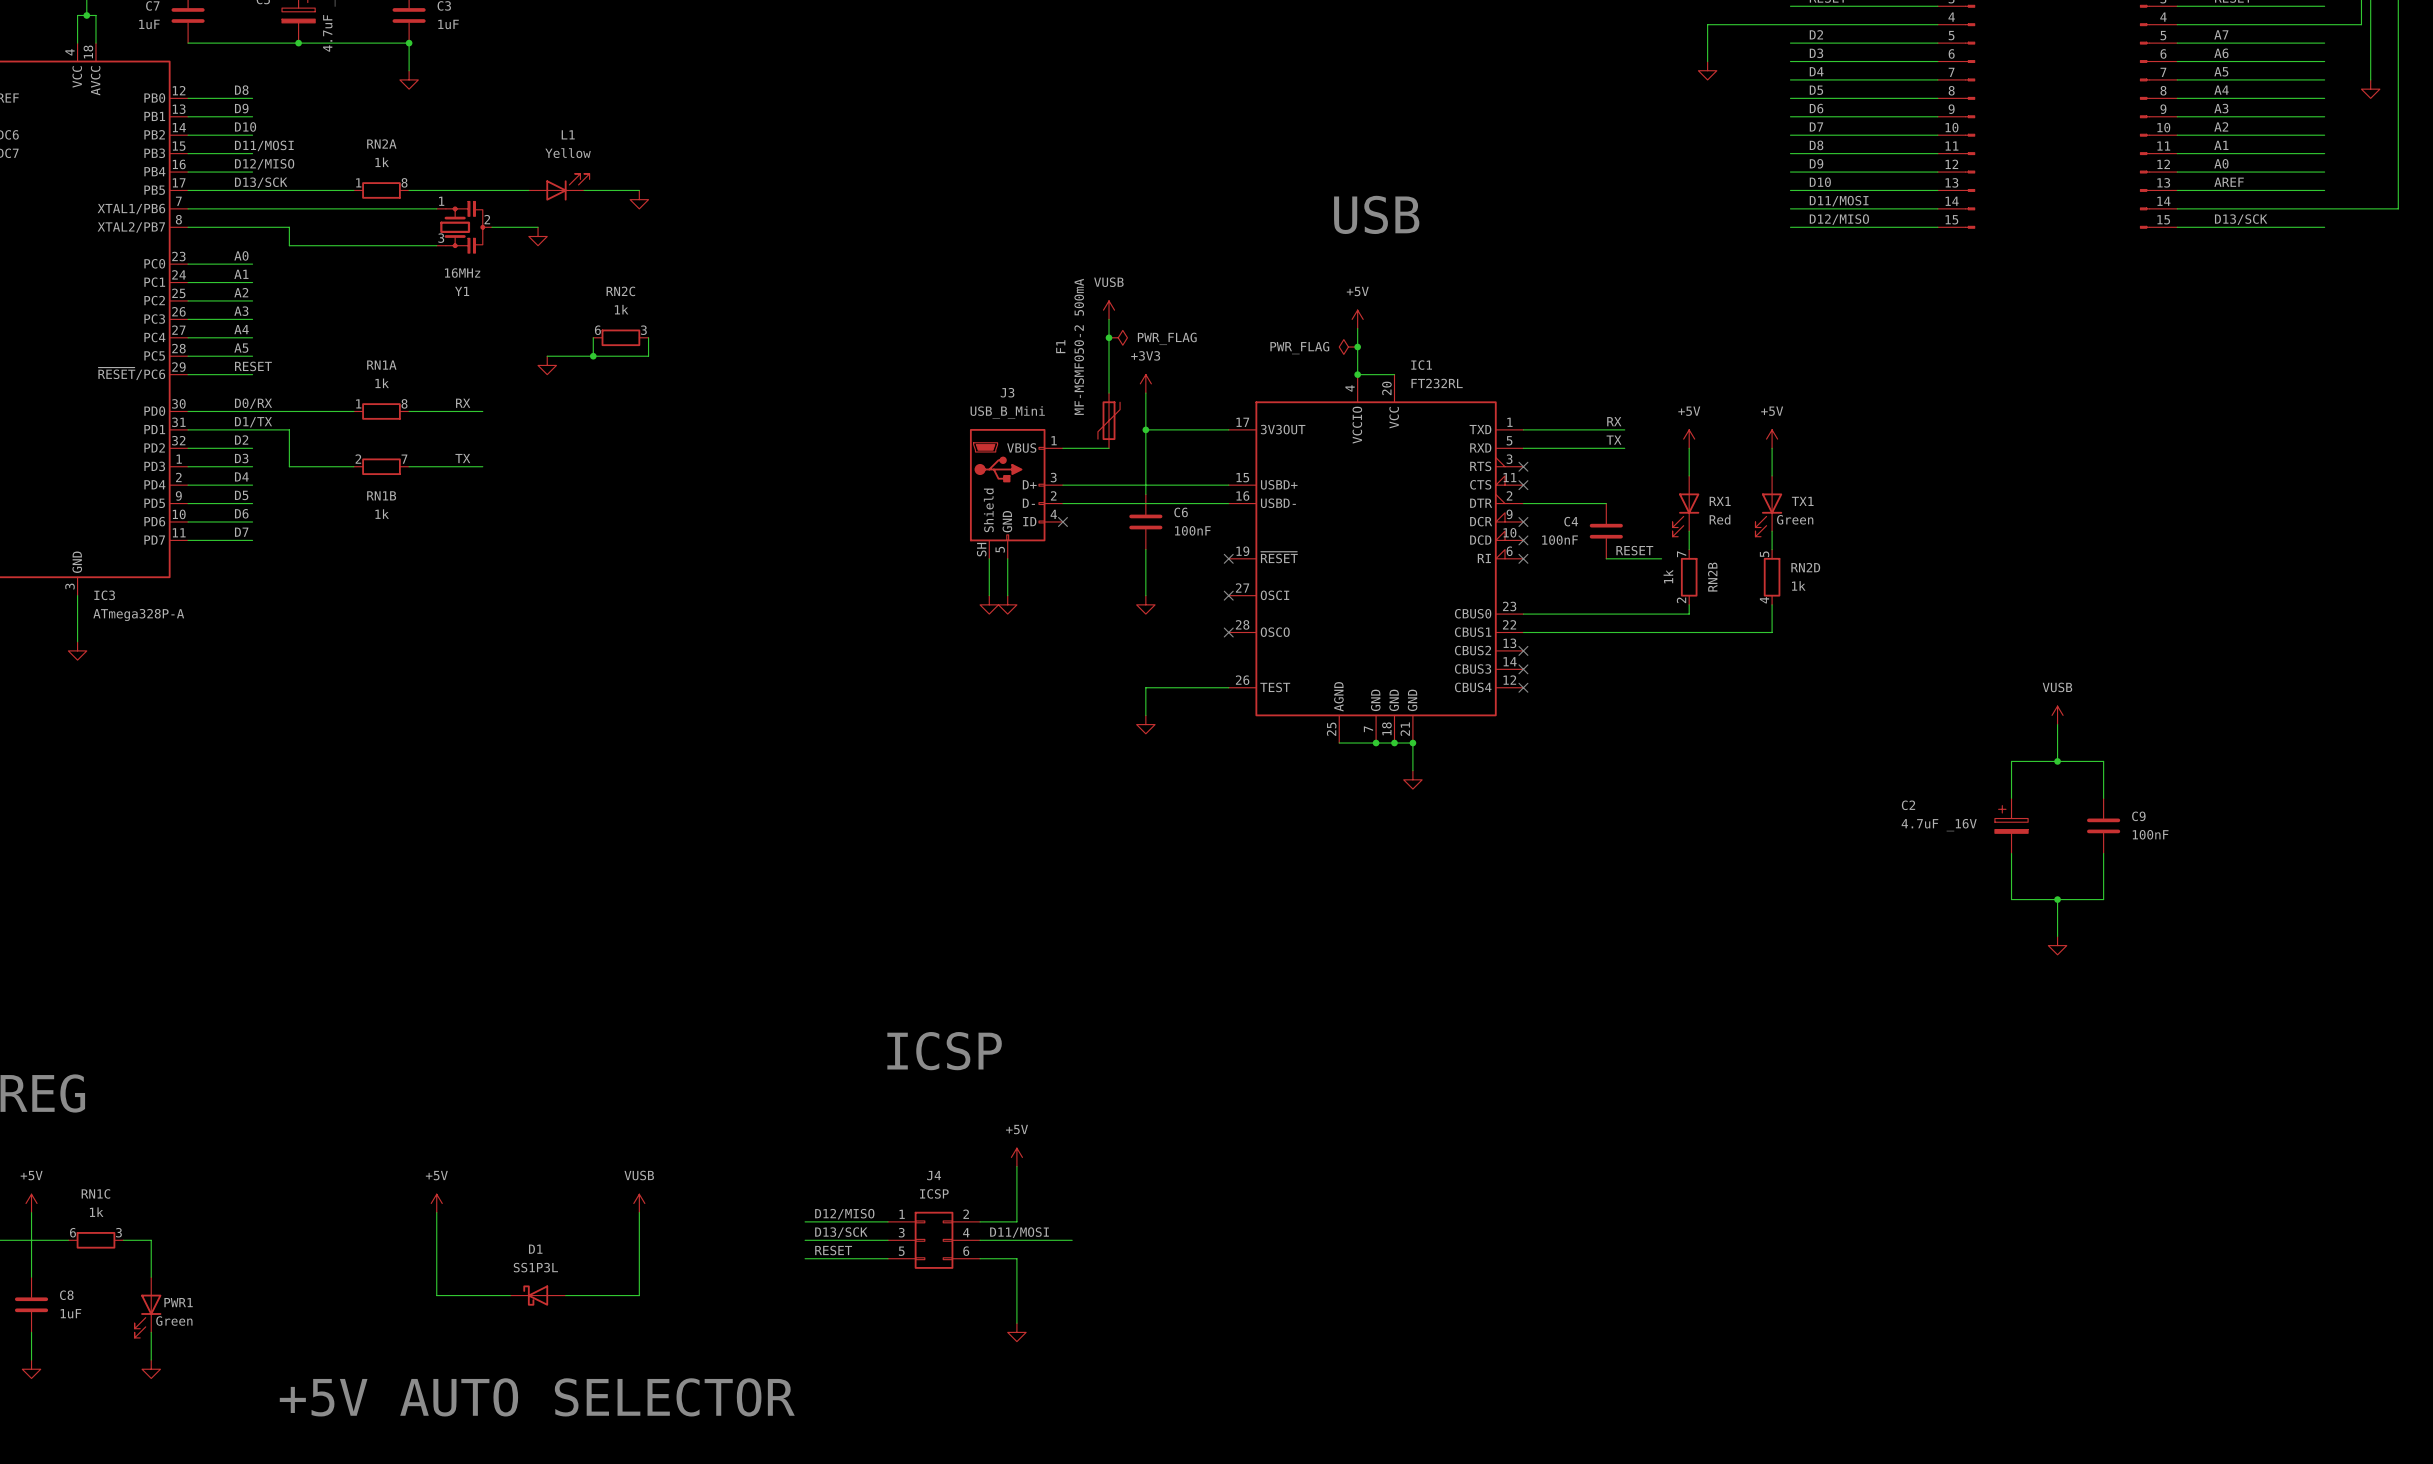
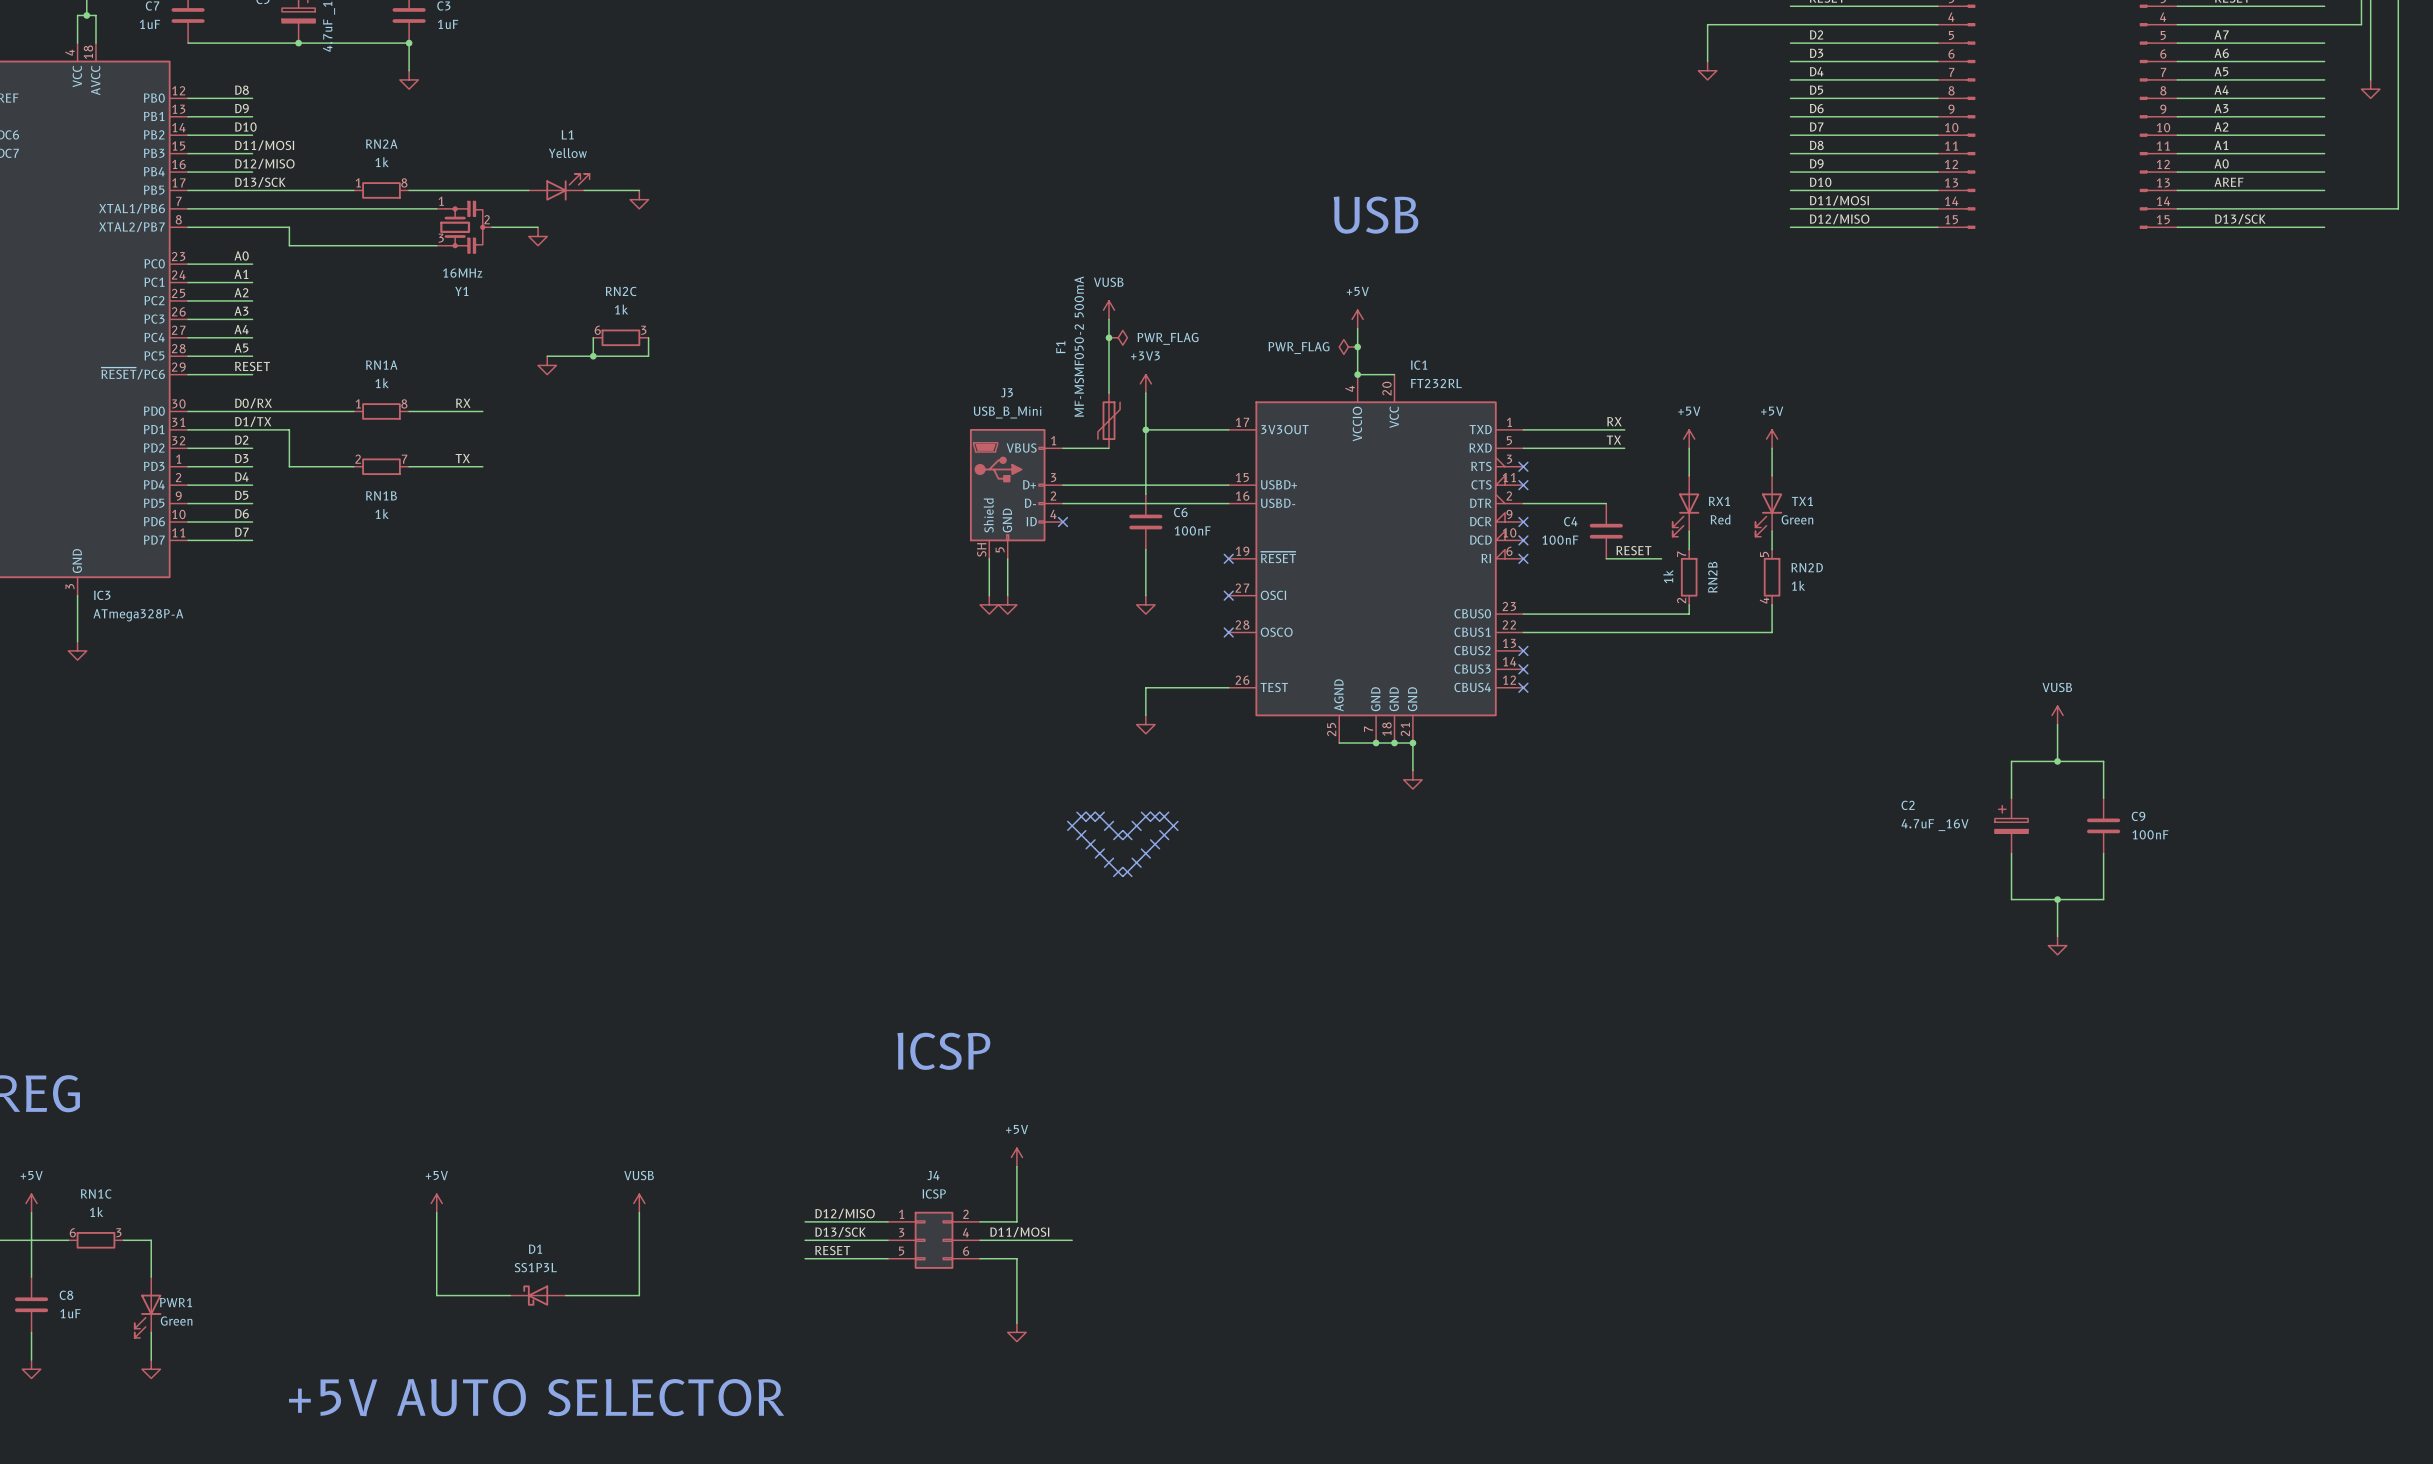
no-connect mark: none -> (1081, 816)
no-connect mark: none -> (1090, 816)
no-connect mark: none -> (1099, 816)
no-connect mark: none -> (1145, 816)
no-connect mark: none -> (1155, 816)
no-connect mark: none -> (1164, 816)
no-connect mark: none -> (1072, 825)
no-connect mark: none -> (1109, 825)
no-connect mark: none -> (1136, 825)
no-connect mark: none -> (1173, 825)
no-connect mark: none -> (1081, 835)
no-connect mark: none -> (1118, 835)
no-connect mark: none -> (1127, 835)
no-connect mark: none -> (1164, 835)
no-connect mark: none -> (1090, 844)
no-connect mark: none -> (1155, 844)
no-connect mark: none -> (1099, 853)
no-connect mark: none -> (1145, 853)
no-connect mark: none -> (1109, 862)
no-connect mark: none -> (1136, 862)
no-connect mark: none -> (1118, 871)
no-connect mark: none -> (1127, 871)

